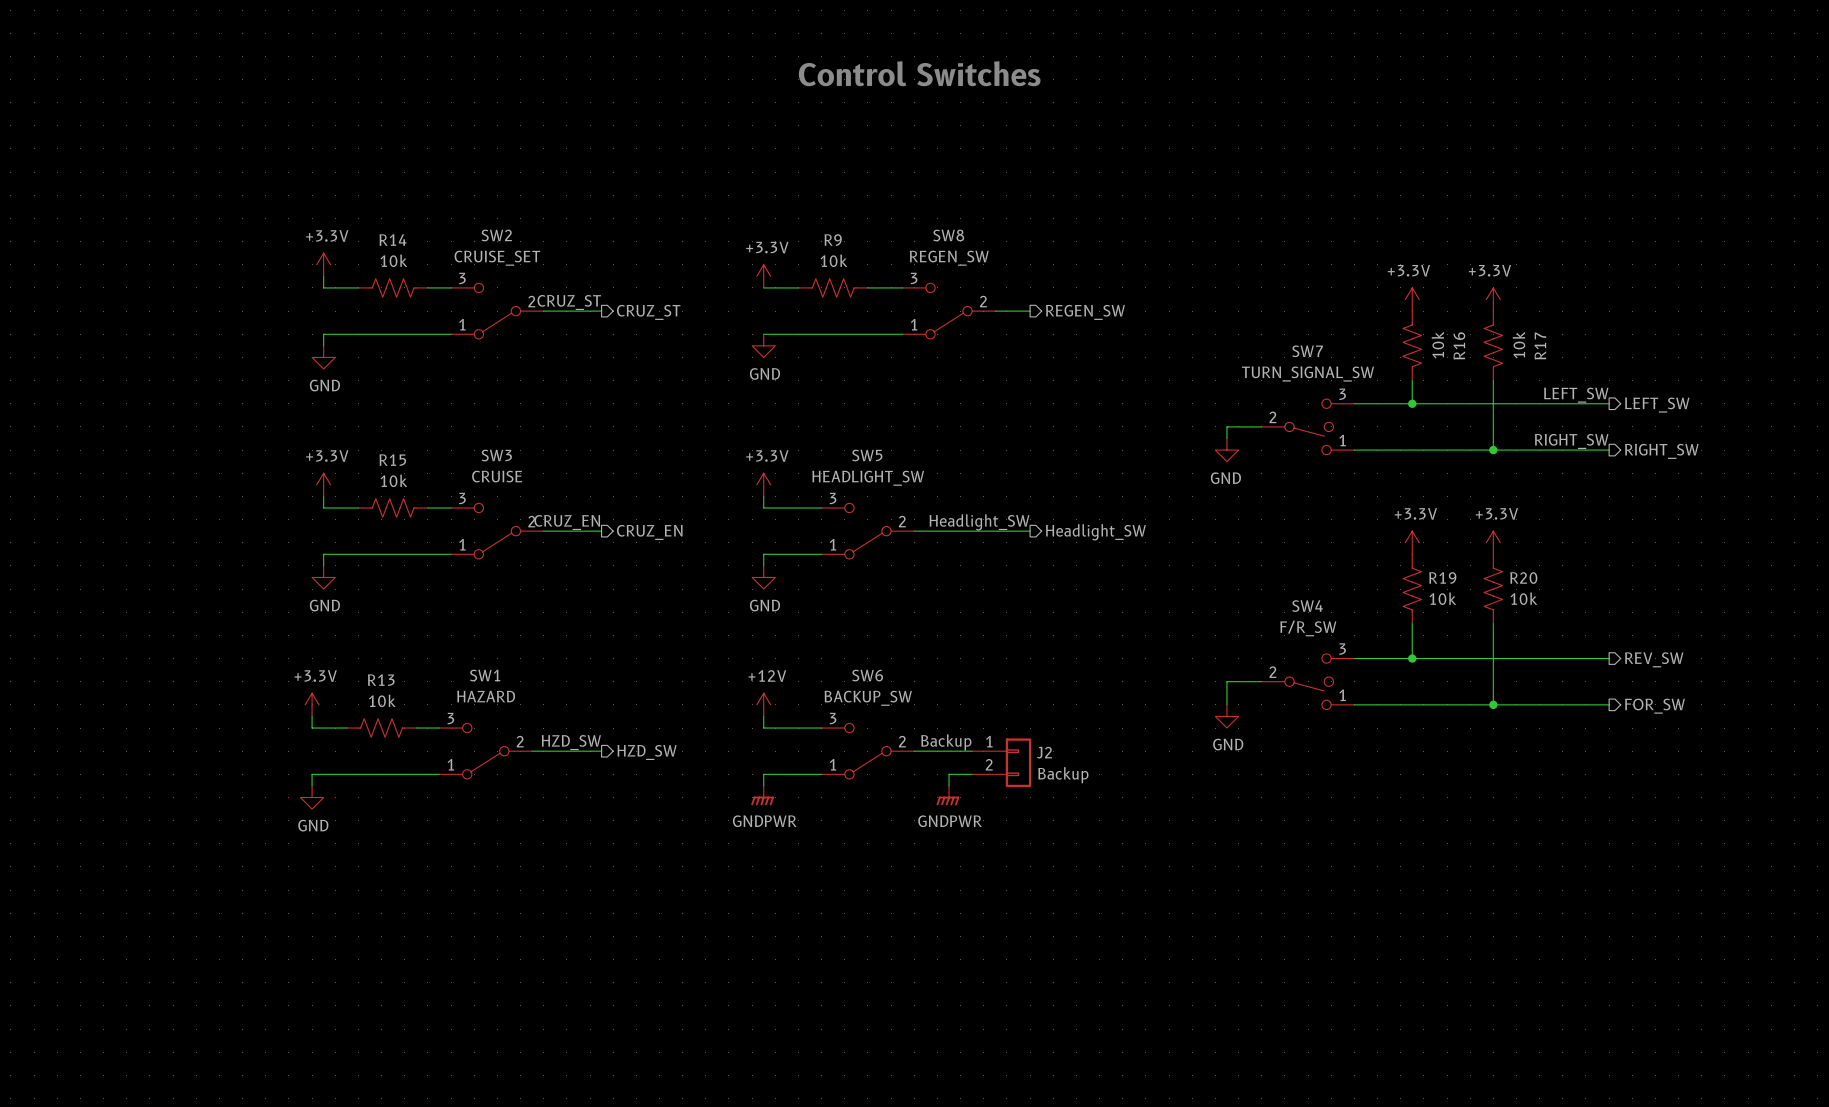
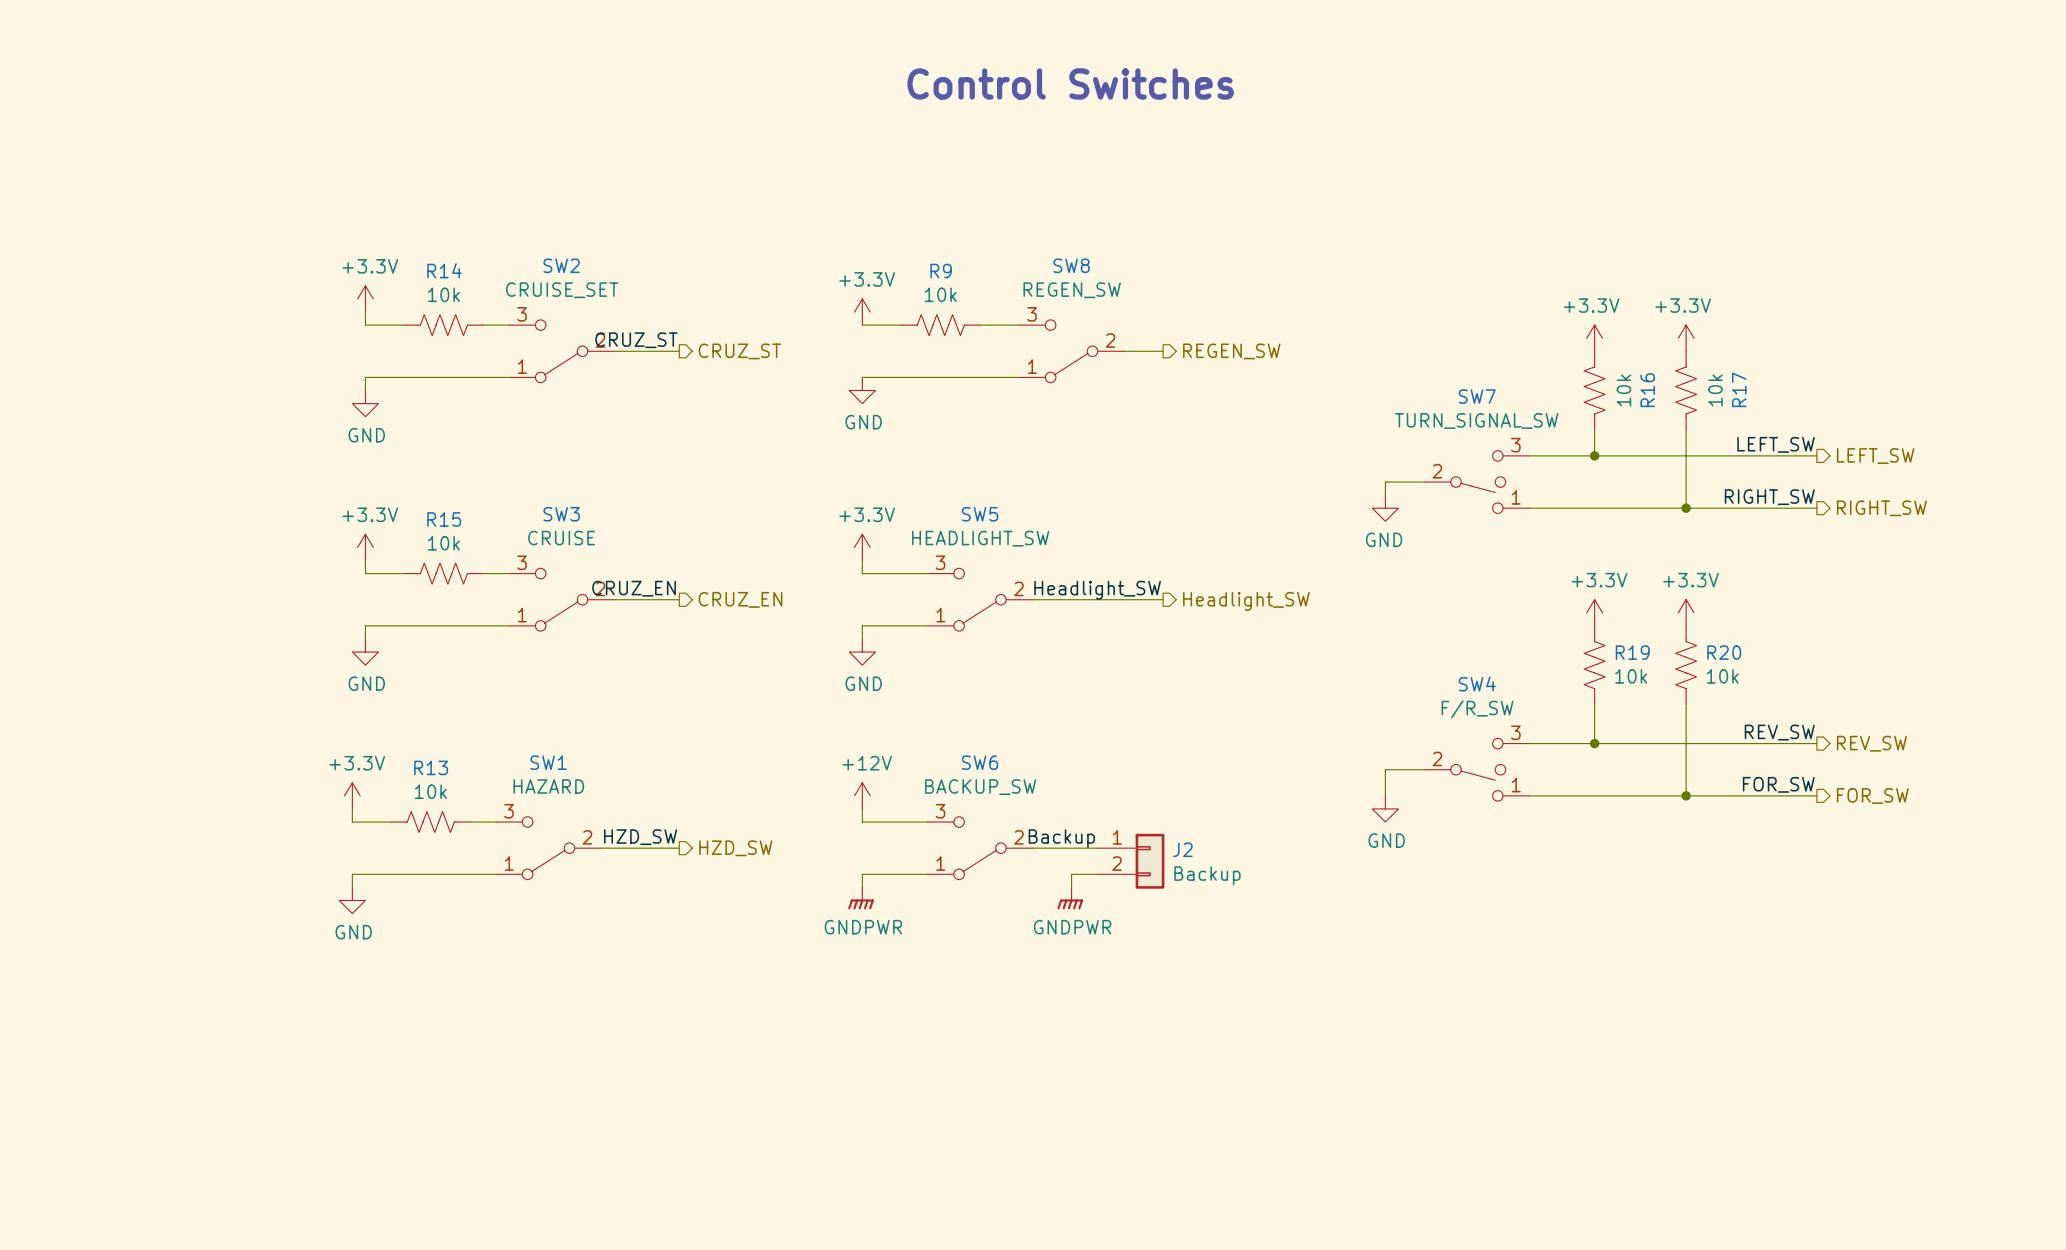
label: none -> REV_SW (1779, 732)
label: none -> FOR_SW (1778, 784)

